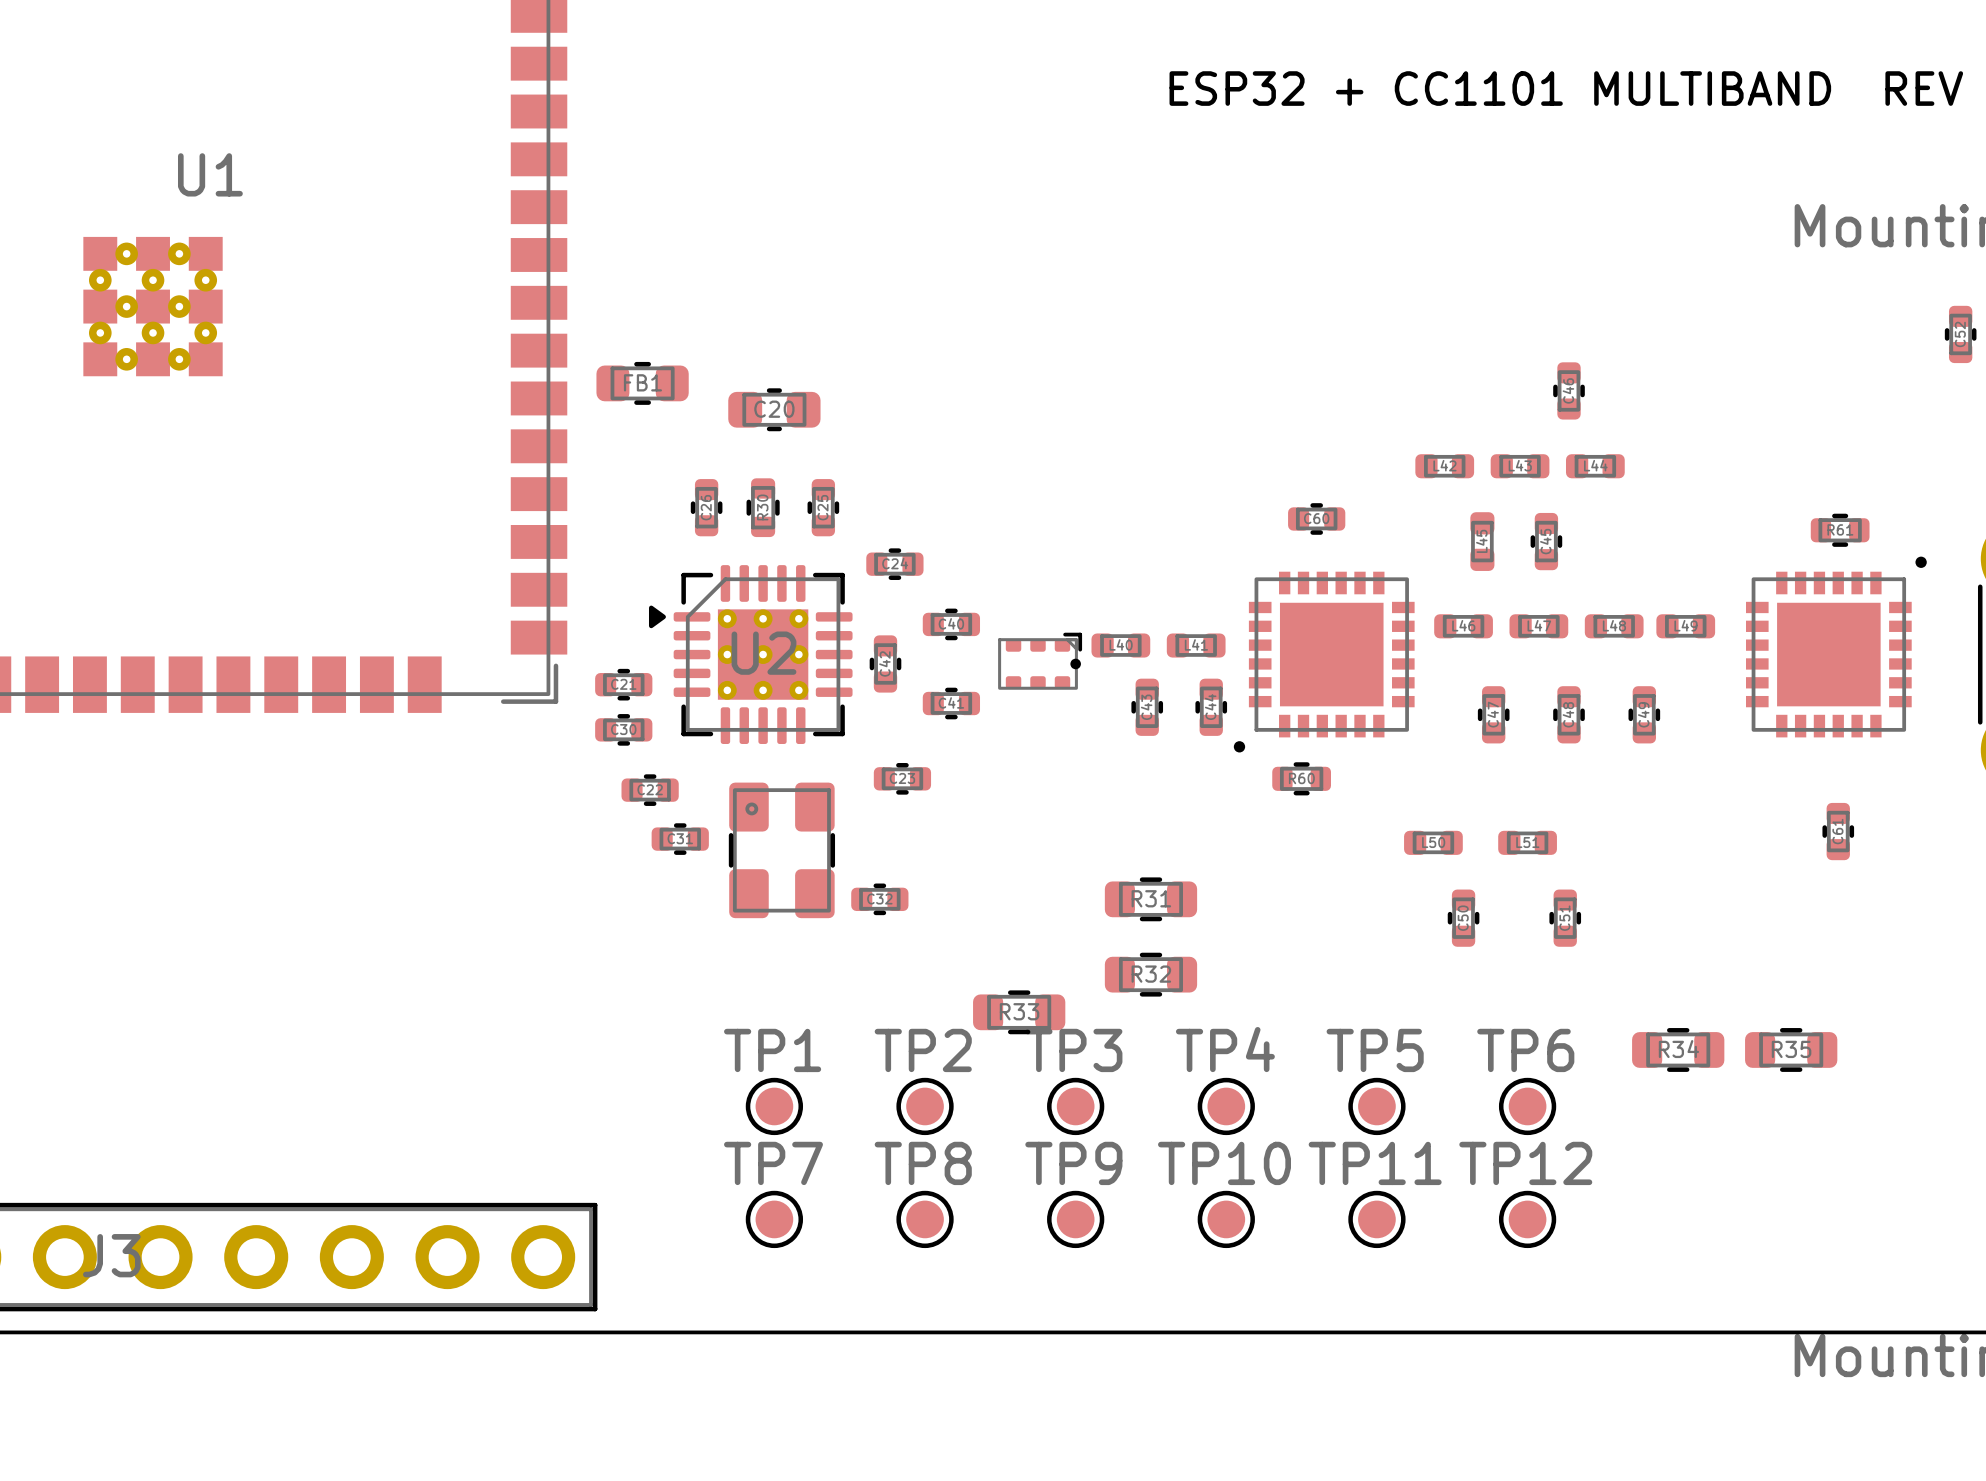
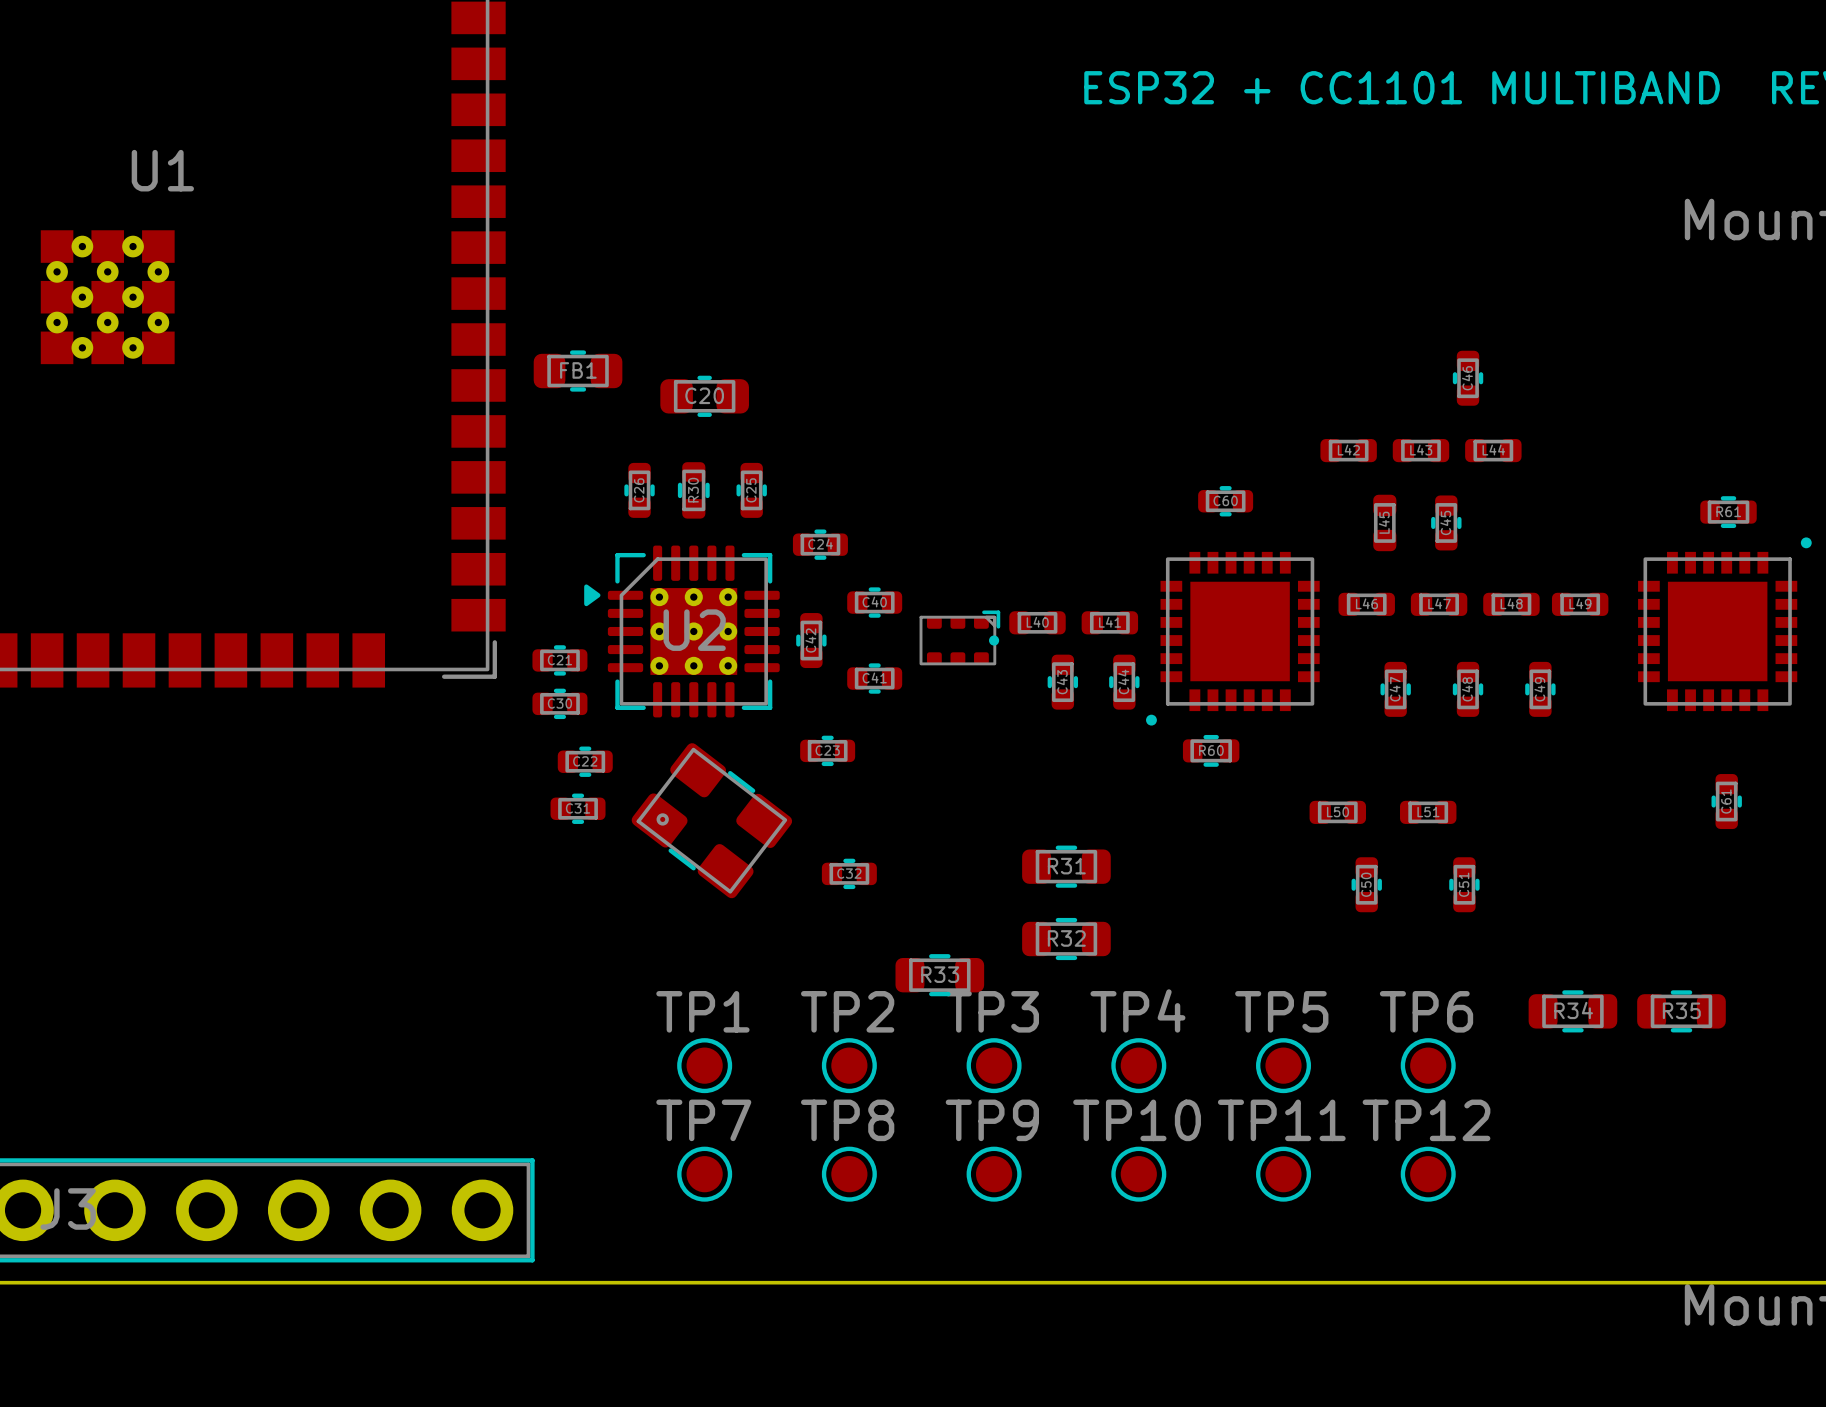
C31 position: (680, 839) -> (578, 808)
part rotation: 0° (781, 850) -> 52.5° counterclockwise (711, 820)
C32 position: (879, 899) -> (849, 873)

